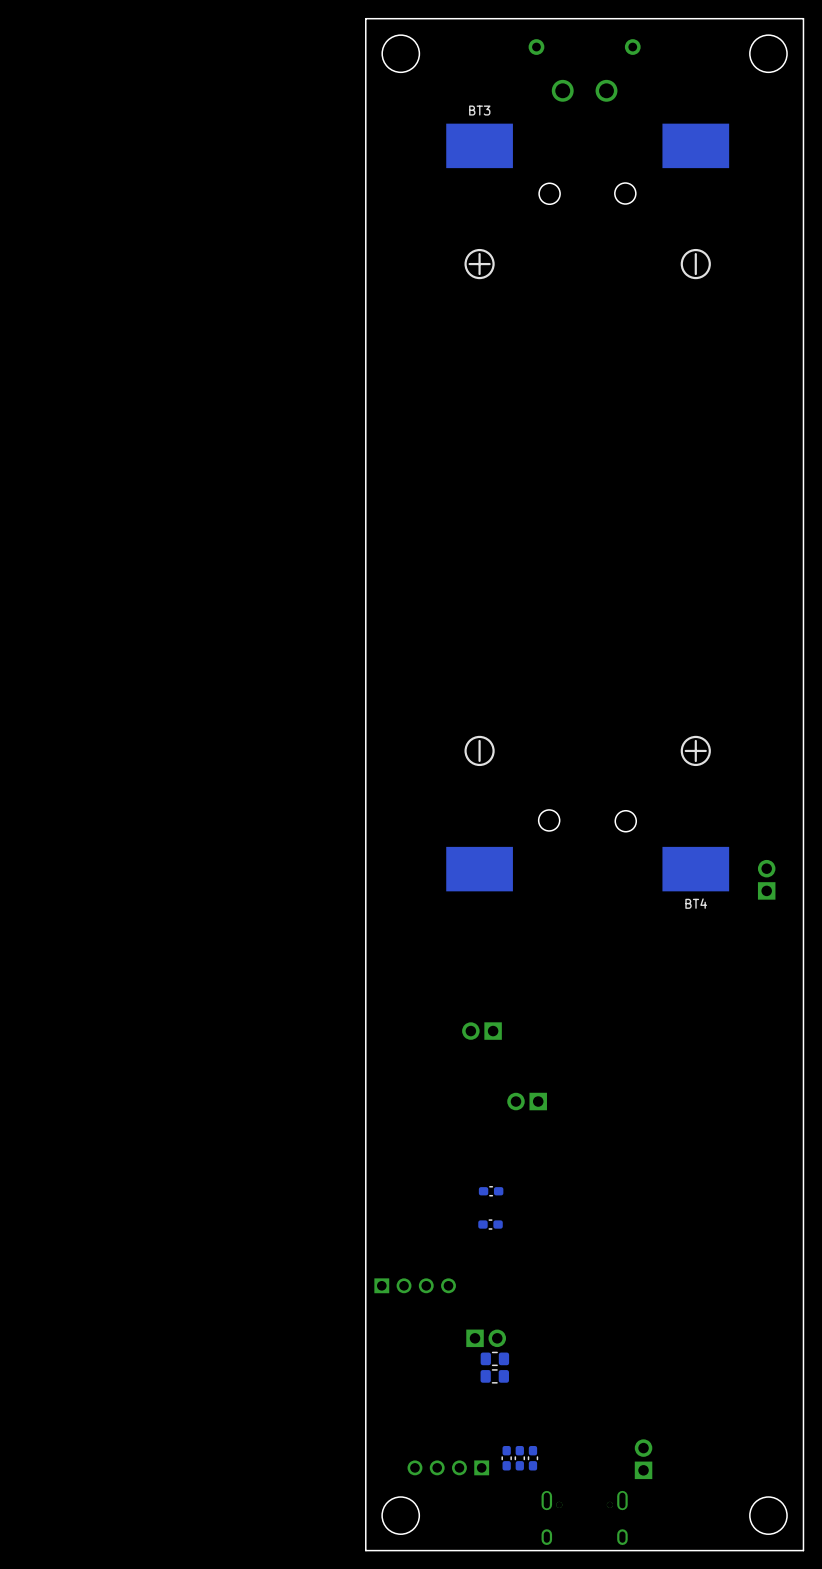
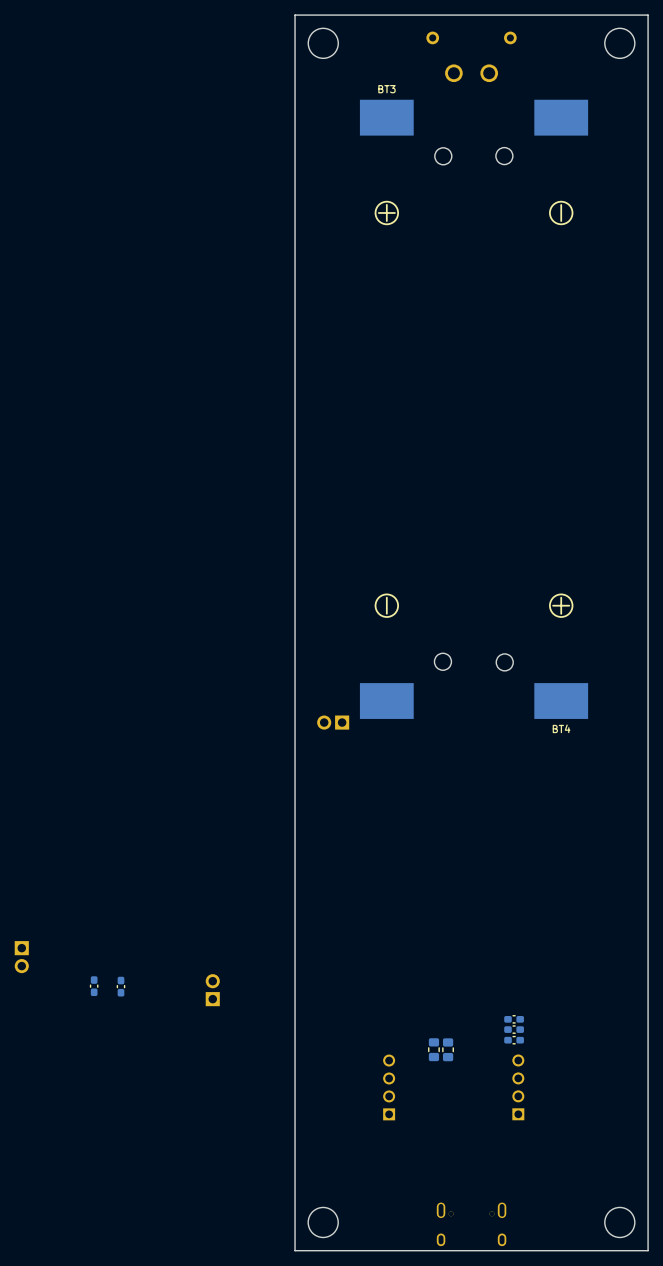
part: (766, 879) -> none
part: none -> (333, 722)
part: (481, 1031) -> none
part: (527, 1101) -> none
part: none -> (21, 957)
part: (491, 1191) -> none
part: none -> (94, 986)
part: none -> (120, 986)
part: (490, 1224) -> none
part: none -> (212, 990)
part: none -> (514, 1019)
part: none -> (514, 1029)
part: (415, 1285) -> none
part: none -> (514, 1040)
part: none -> (433, 1049)
part: none -> (448, 1049)
part: (486, 1338) -> none
part: none -> (389, 1087)
part: none -> (518, 1087)
part: (494, 1358) -> none
part: (494, 1376) -> none
part: (506, 1458) -> none
part: (519, 1458) -> none
part: (532, 1458) -> none
part: (643, 1459) -> none
part: (448, 1467) -> none

